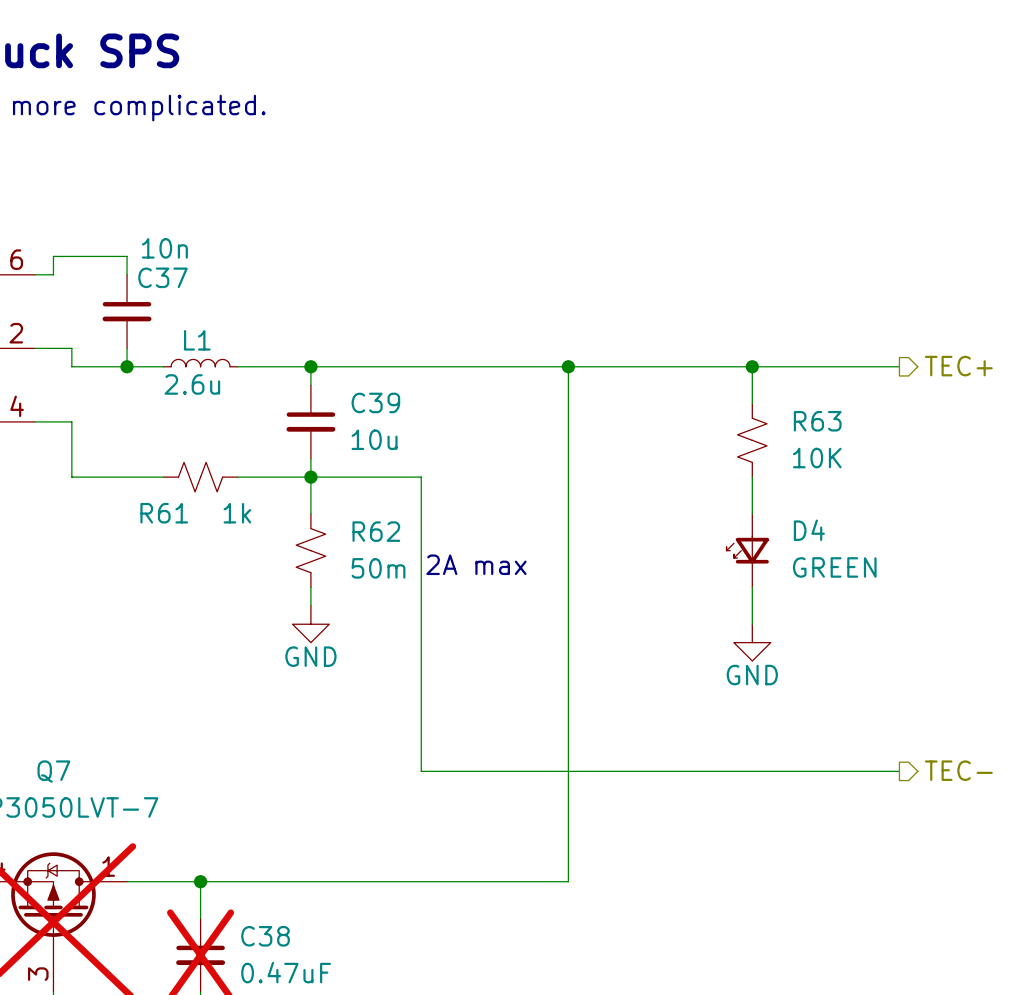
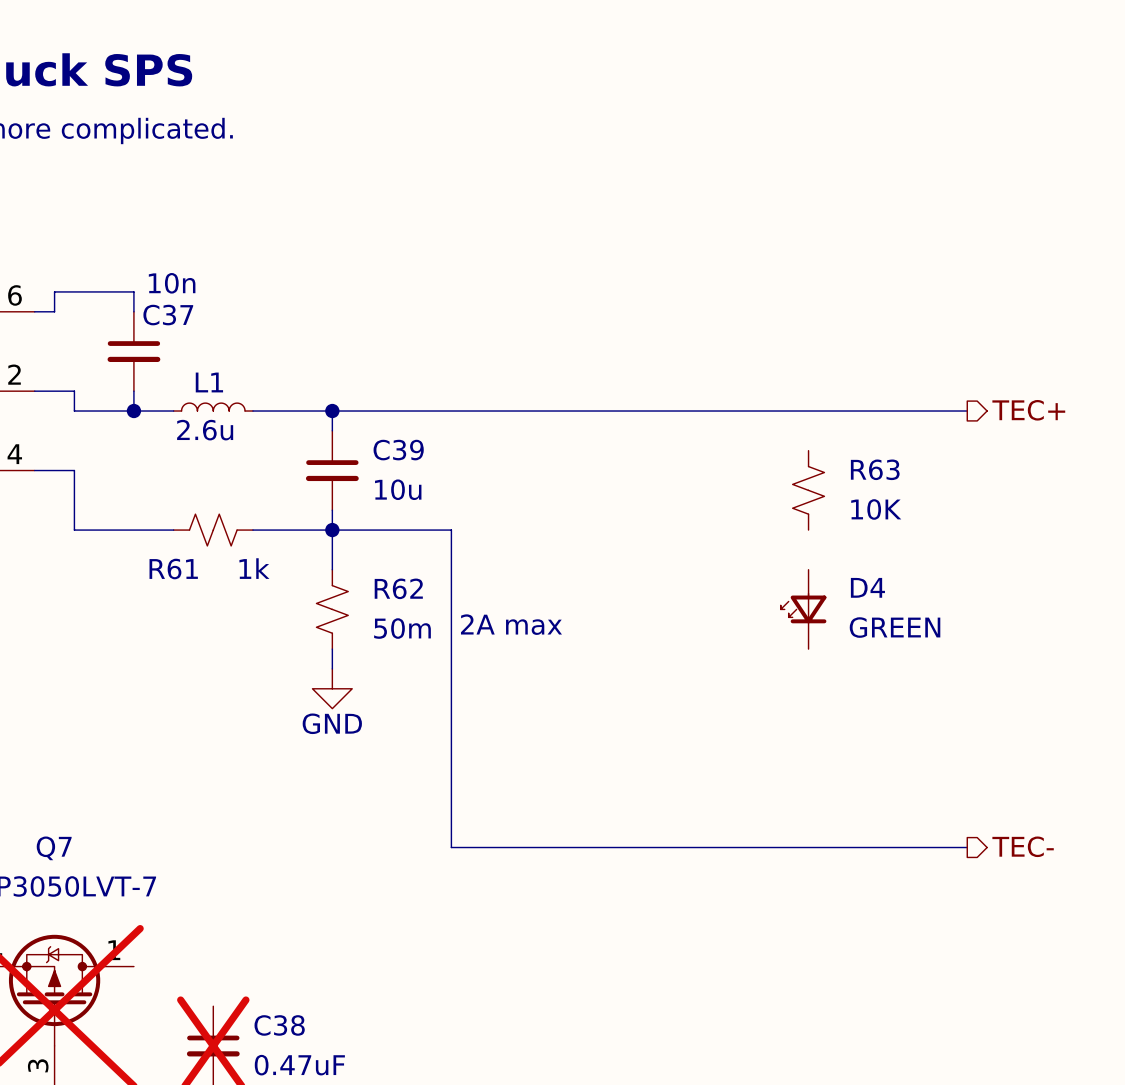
wire: (568, 366) (568, 881) (127, 881) -> none
junction: (568, 366) -> none
wire: (752, 366) (752, 403) -> none
junction: (752, 366) -> none
wire: (752, 477) (752, 513) -> none
wire: (752, 587) (752, 624) -> none
power symbol: GND (752, 642) -> none
wire: (200, 881) (200, 918) -> none
junction: (200, 881) -> none

